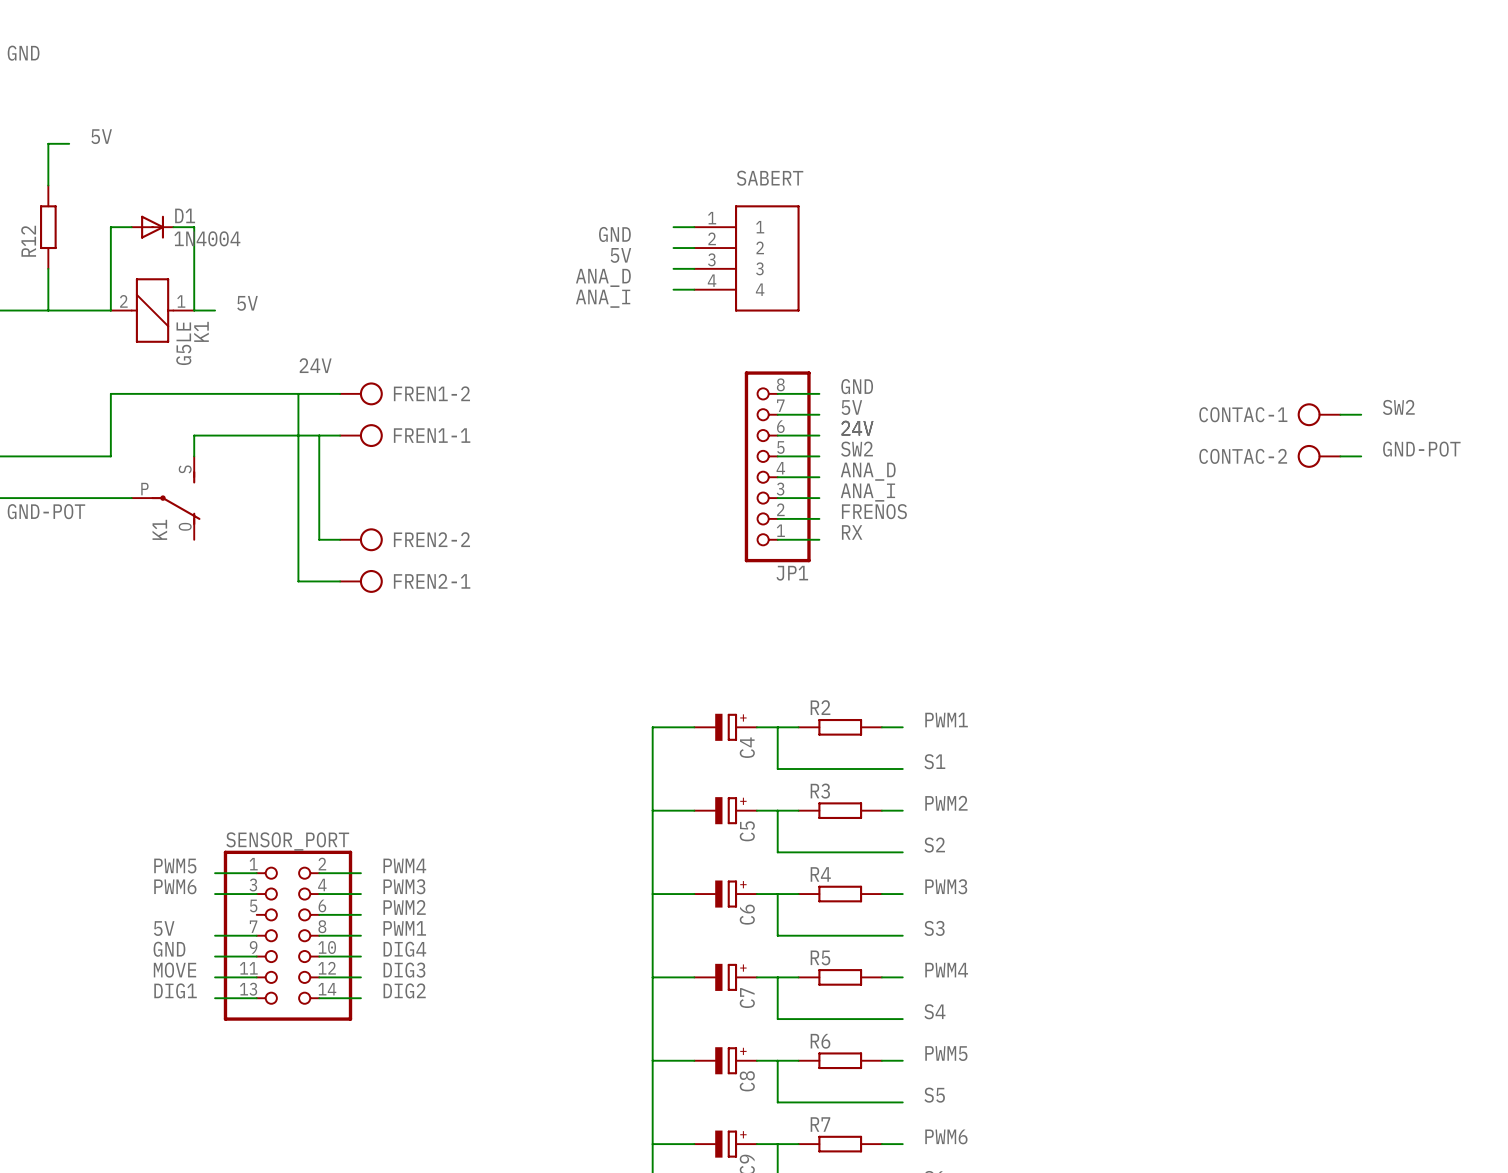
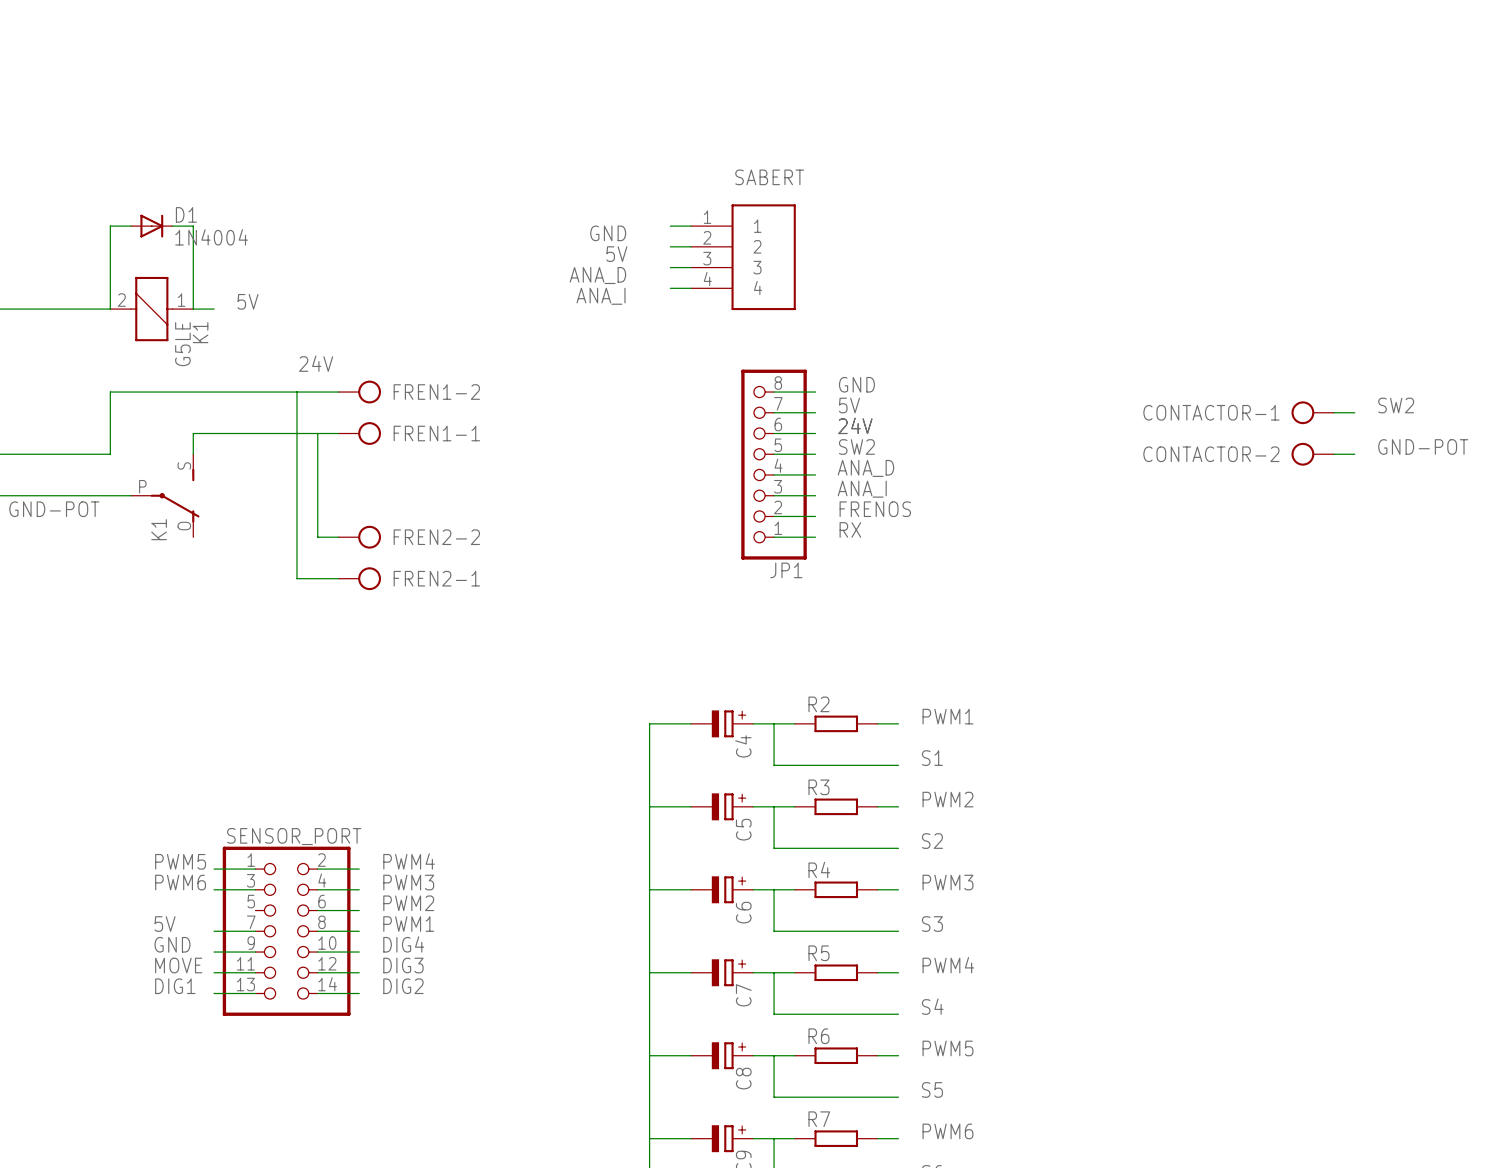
label: GND (23, 53) -> none
label: 5V (101, 136) -> none
wire: (69, 143) (48, 143) (48, 185) -> none
R12: (48, 227) -> none
wire: (48, 268) (48, 310) -> none
CONTAC-1 name: CONTAC-1 (1243, 414) -> CONTACTOR-1 (1211, 412)
CONTAC-2 name: CONTAC-2 (1243, 456) -> CONTACTOR-2 (1211, 454)

